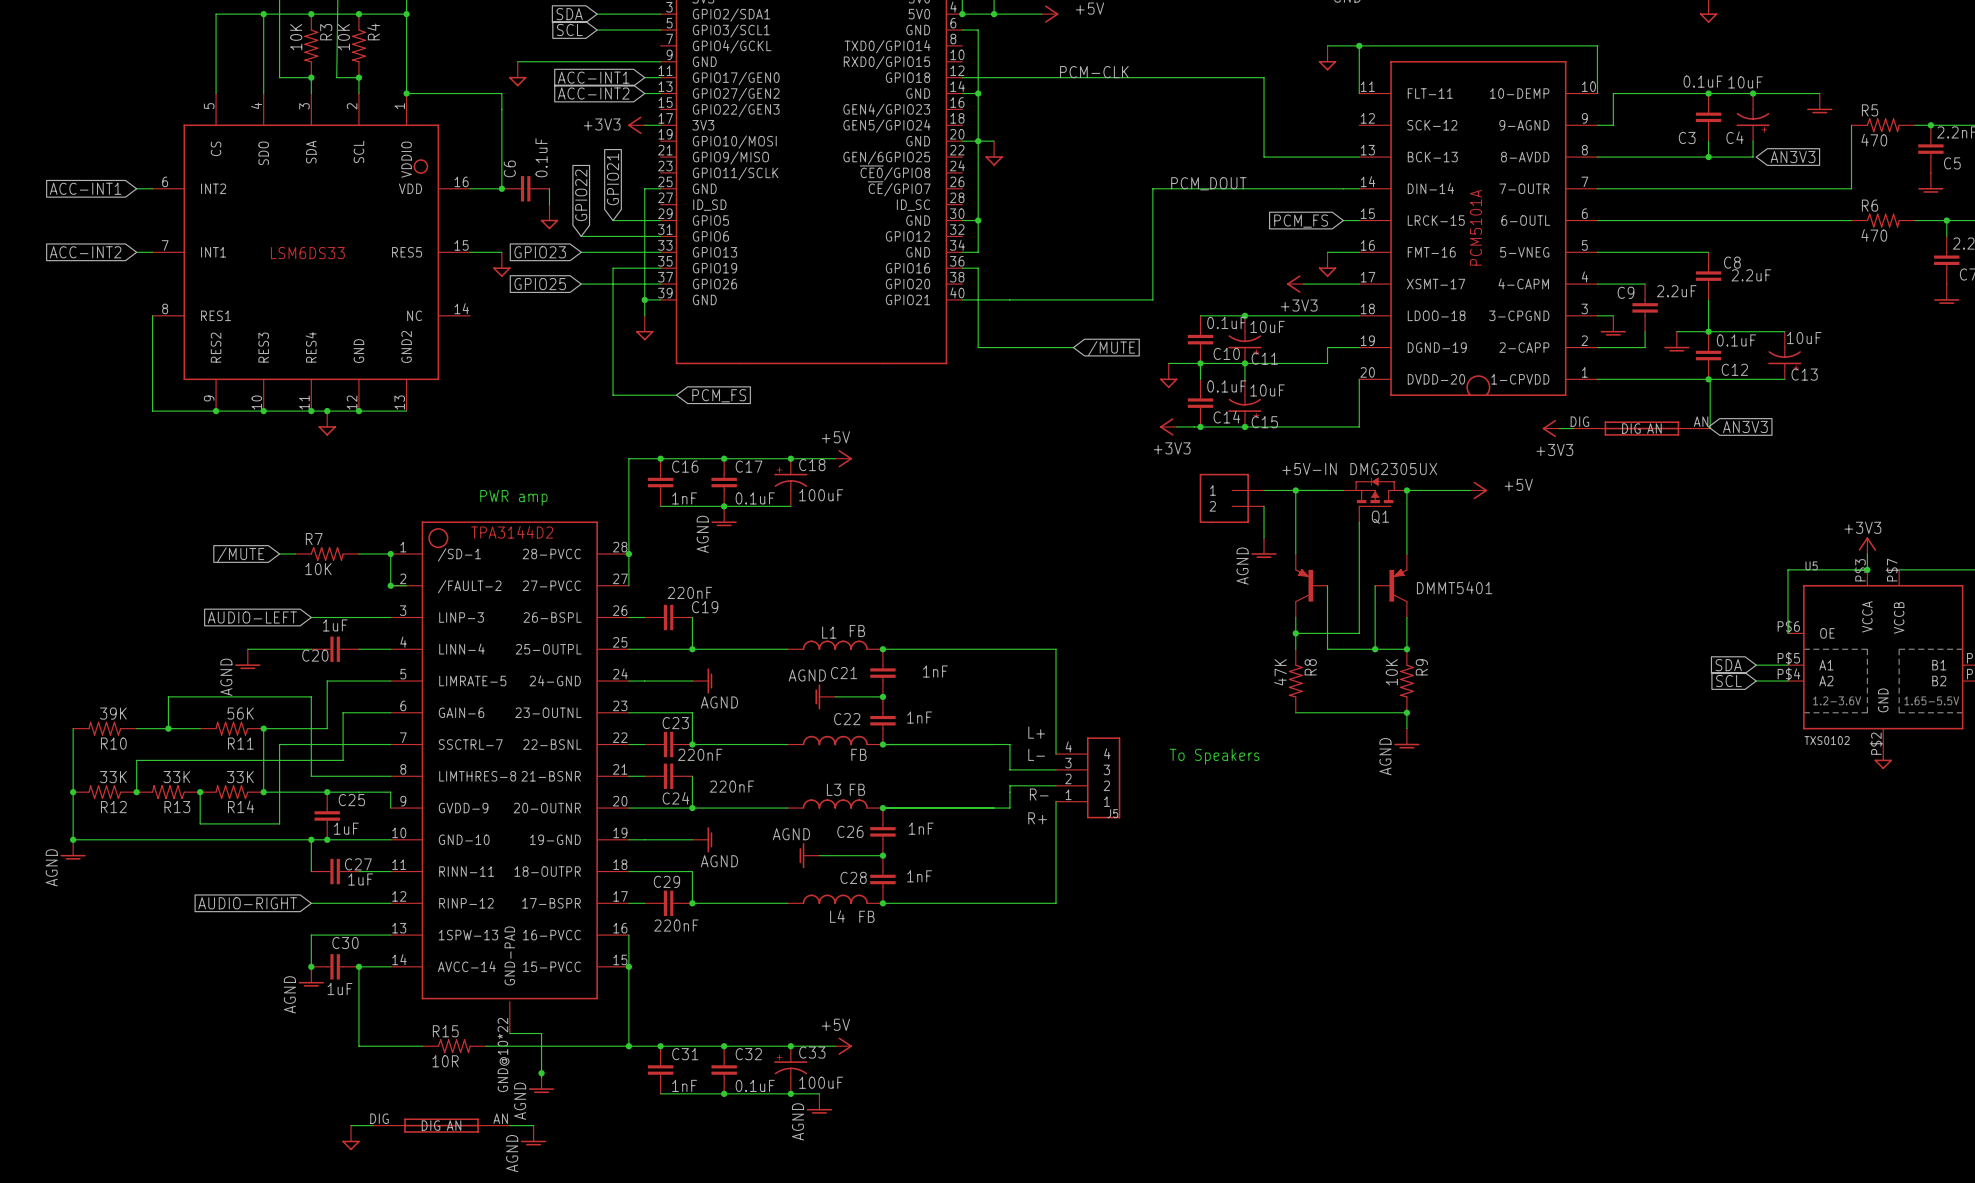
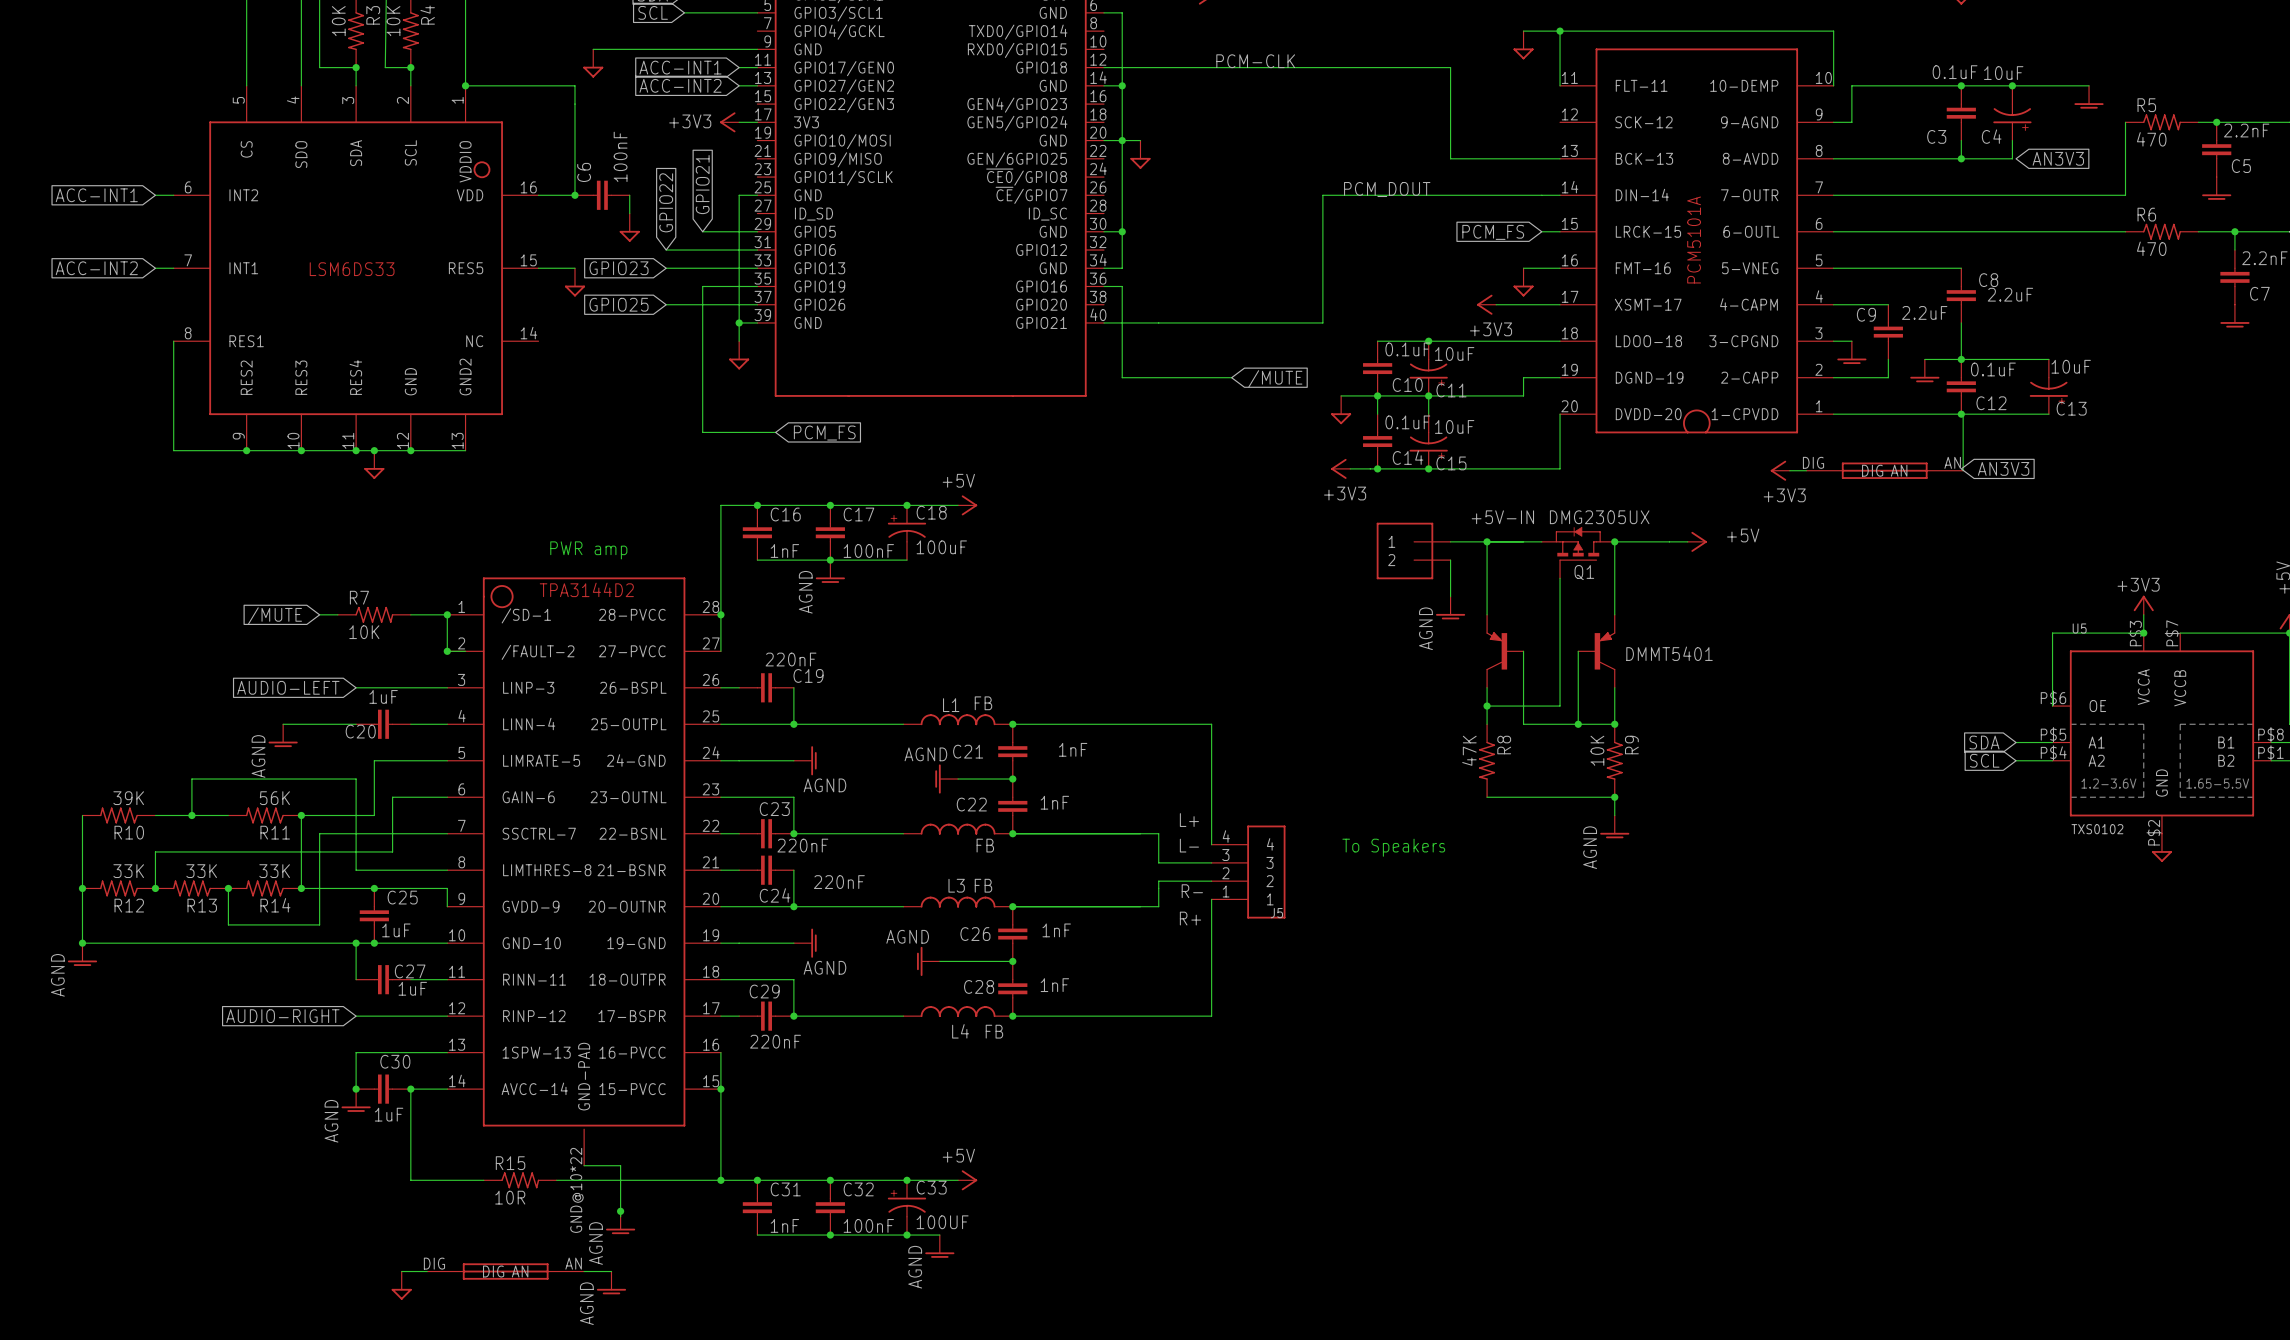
C6 value: 0.1uF (541, 157) -> 100nF (620, 156)
C17 value: 0.1uF (755, 498) -> 100nF (868, 550)
C33 value: 100uF (821, 1082) -> 100UF (942, 1222)
C32 value: 0.1uF (755, 1085) -> 100nF (868, 1225)

